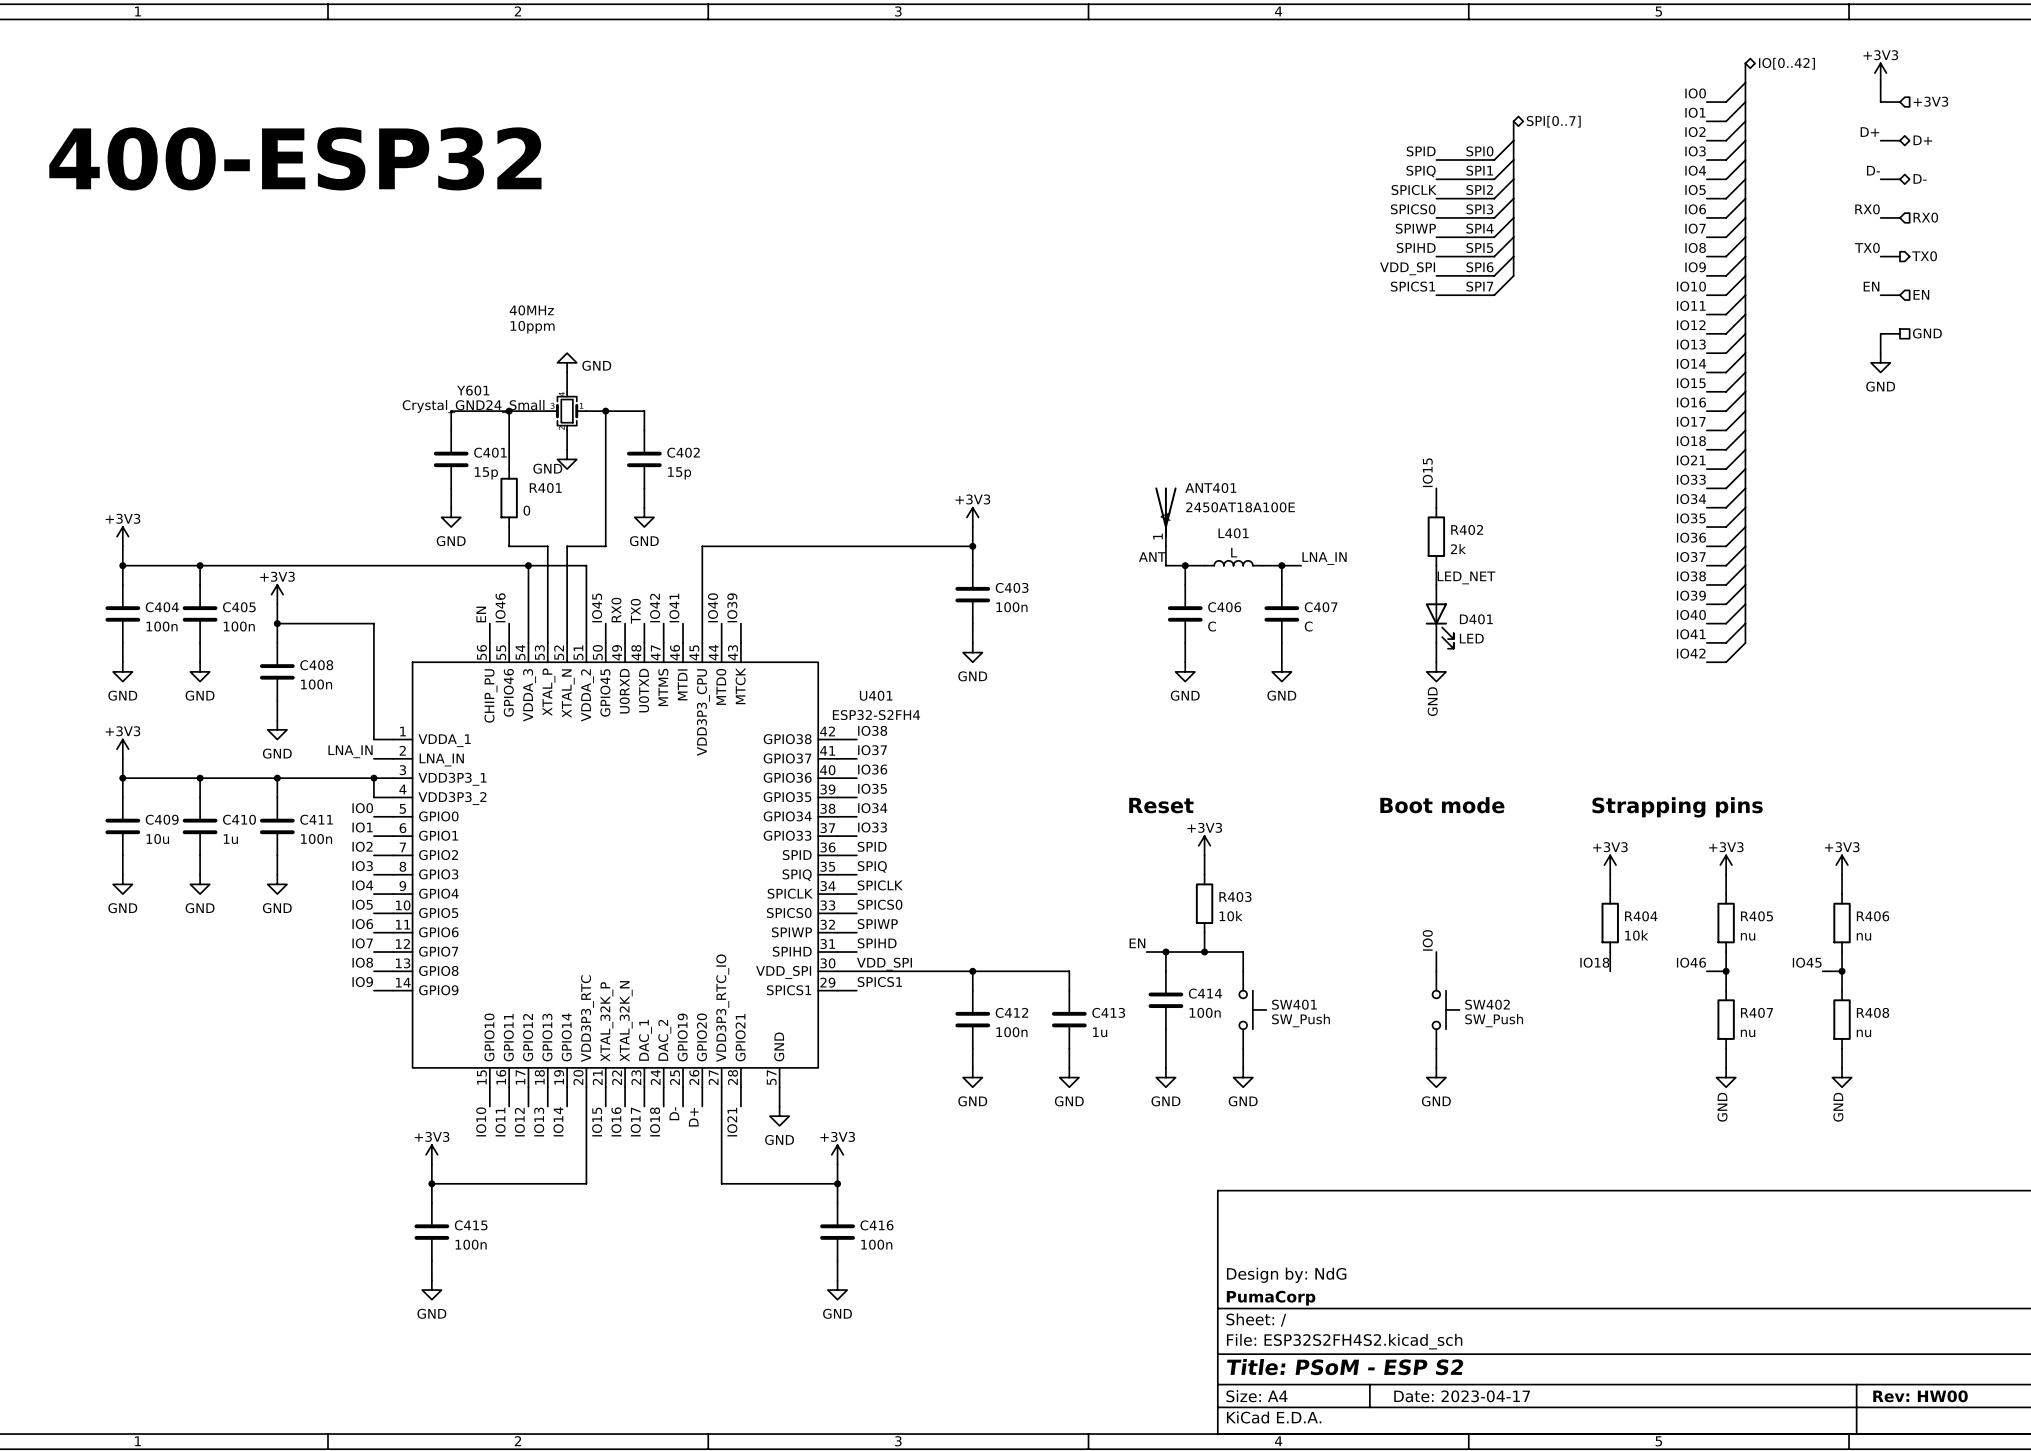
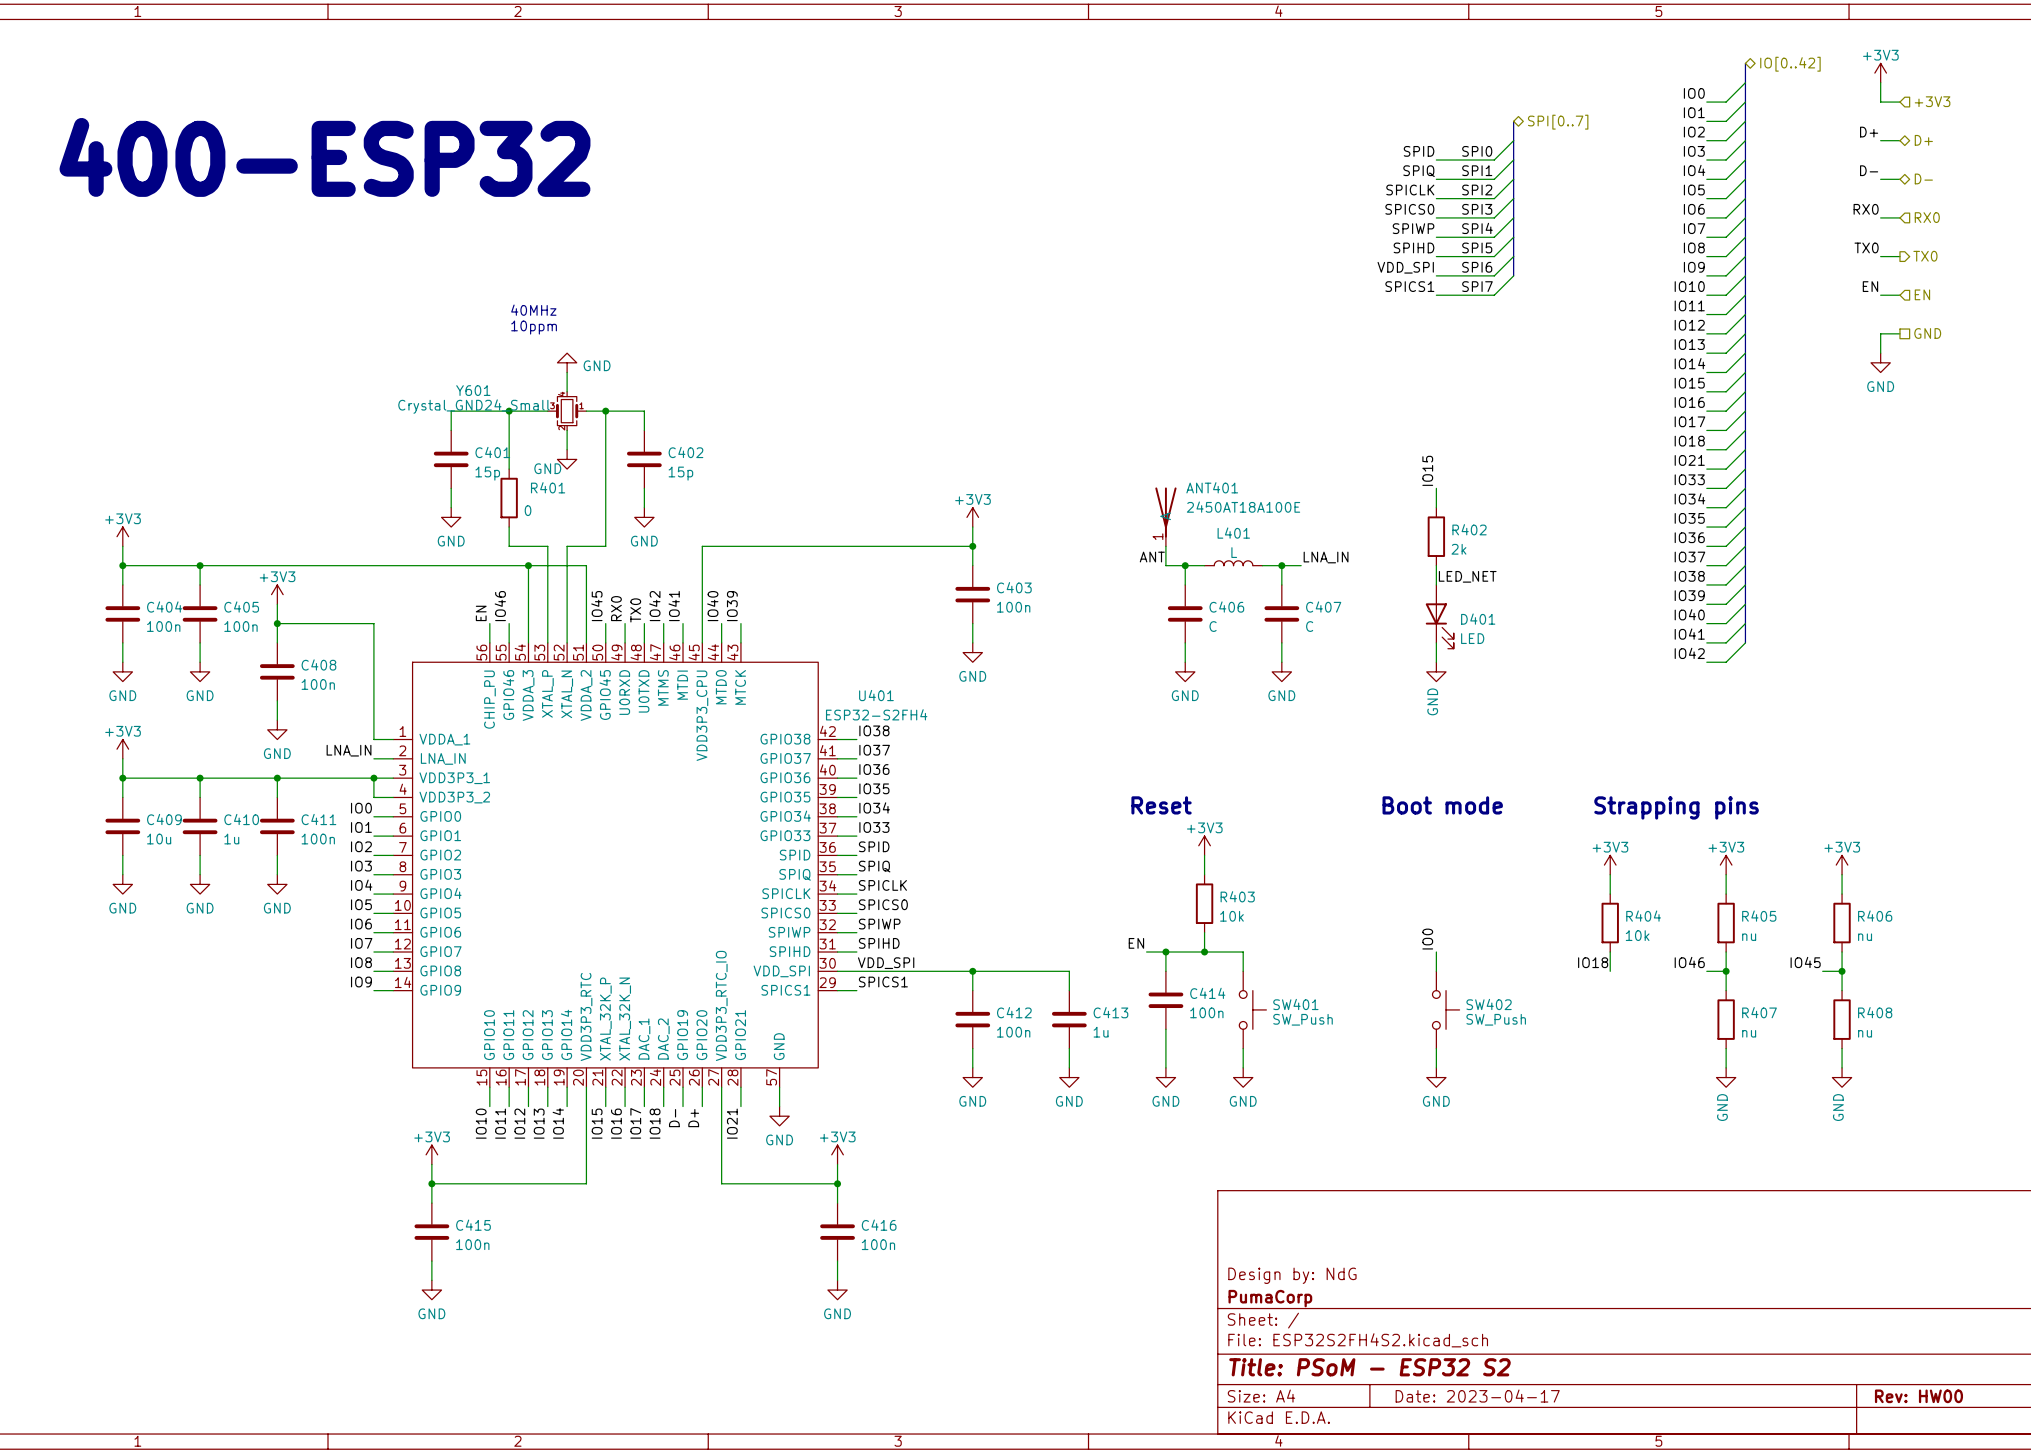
title block: Title: PSoM - ESP S2 (1345, 1367) -> Title: PSoM - ESP32 S2 (1370, 1367)

